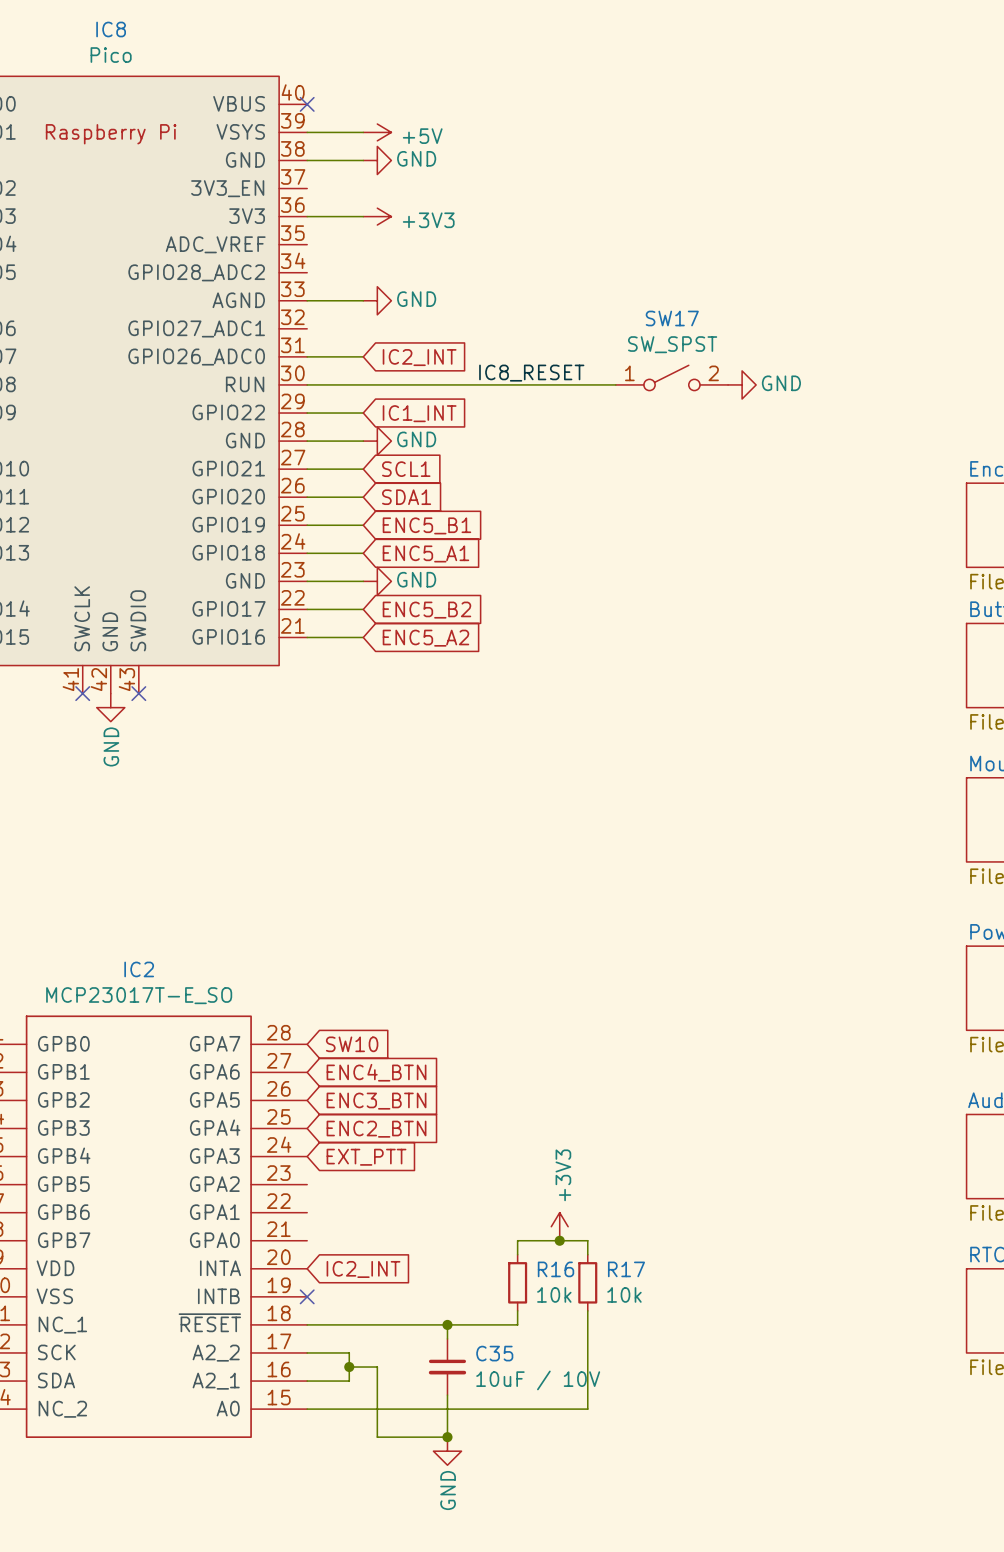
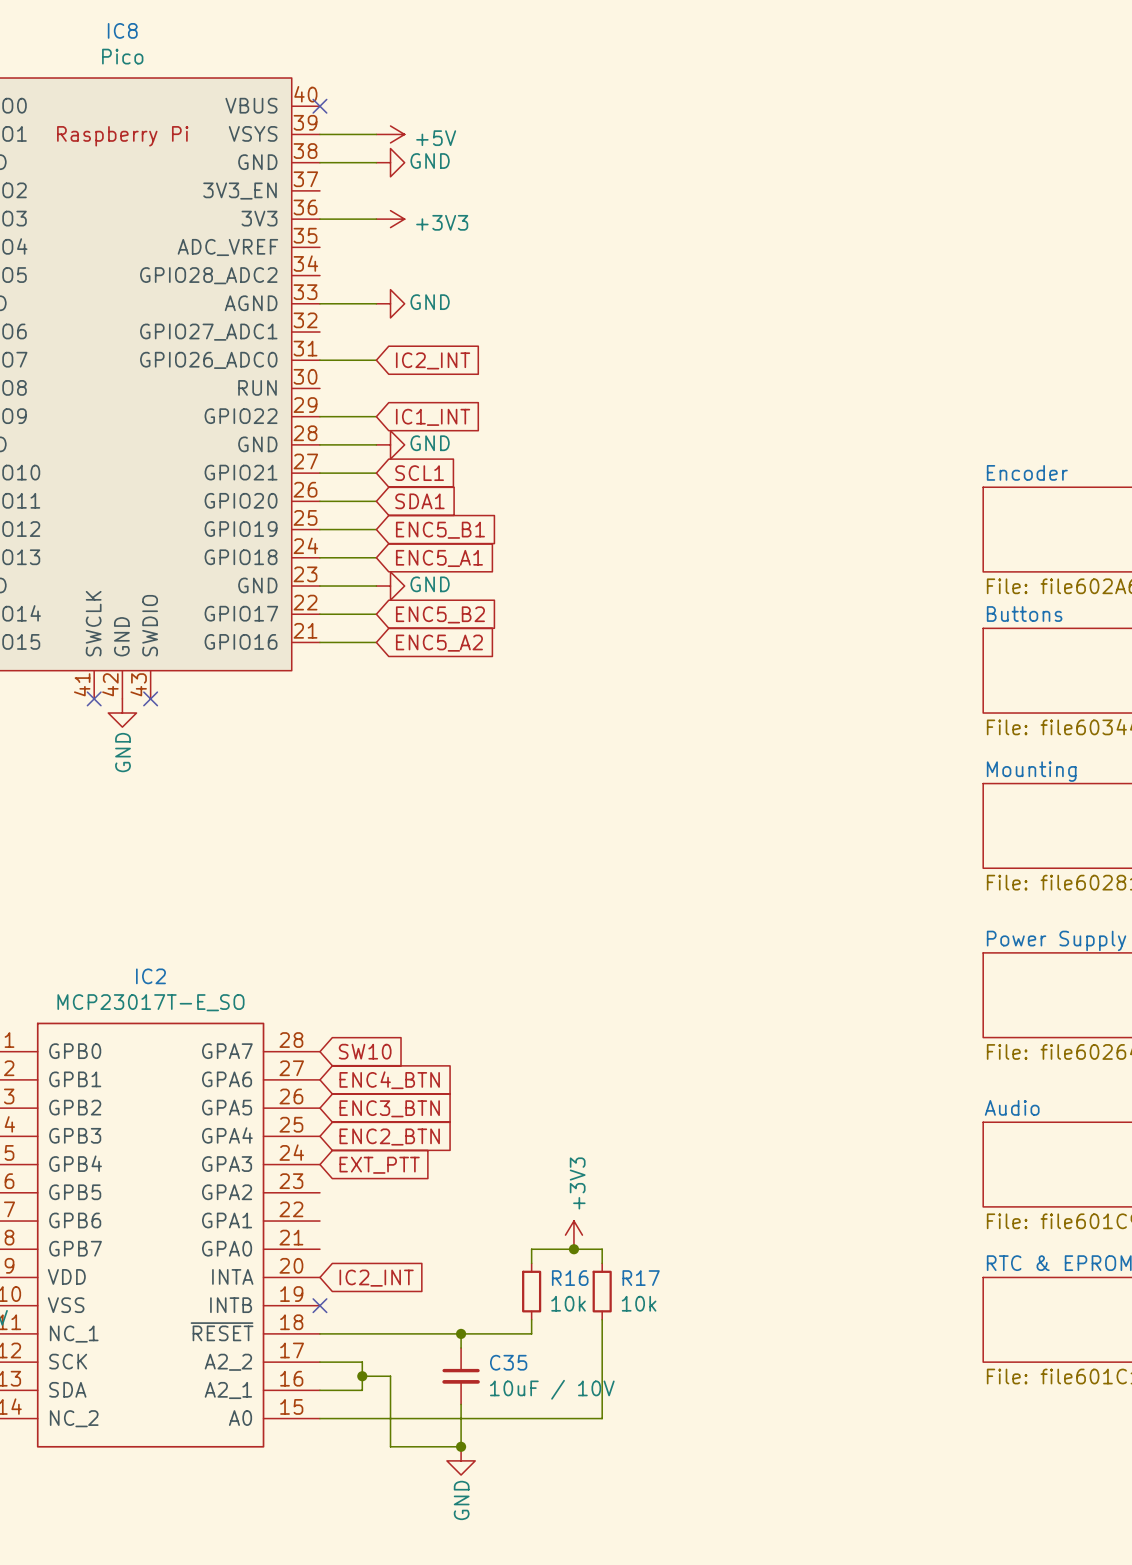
label: IC8_RESET (531, 373) -> none
SW17: SW_SPST (671, 377) -> none
wire: (307, 384) (615, 384) -> none
power symbol: GND (742, 384) -> none

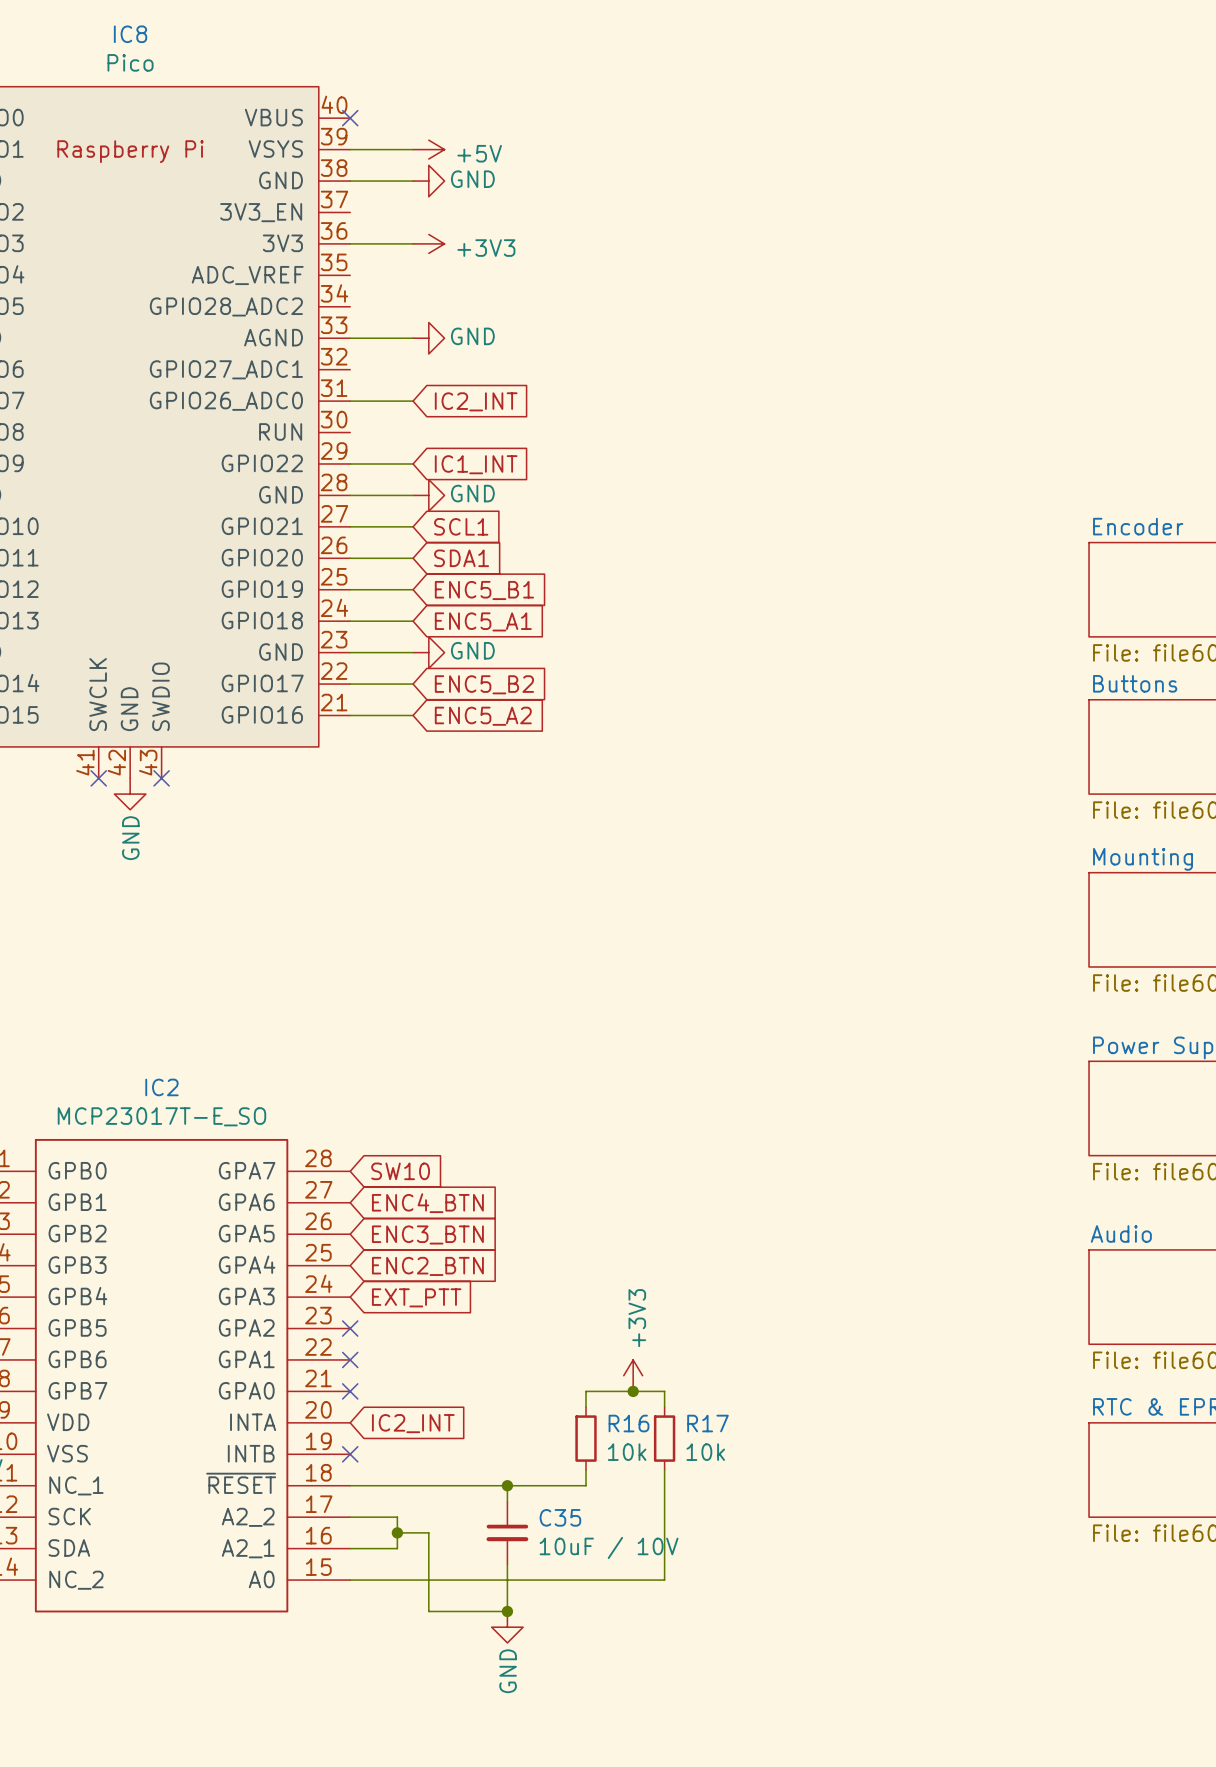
no-connect mark: none -> (350, 1328)
no-connect mark: none -> (350, 1359)
no-connect mark: none -> (350, 1391)

